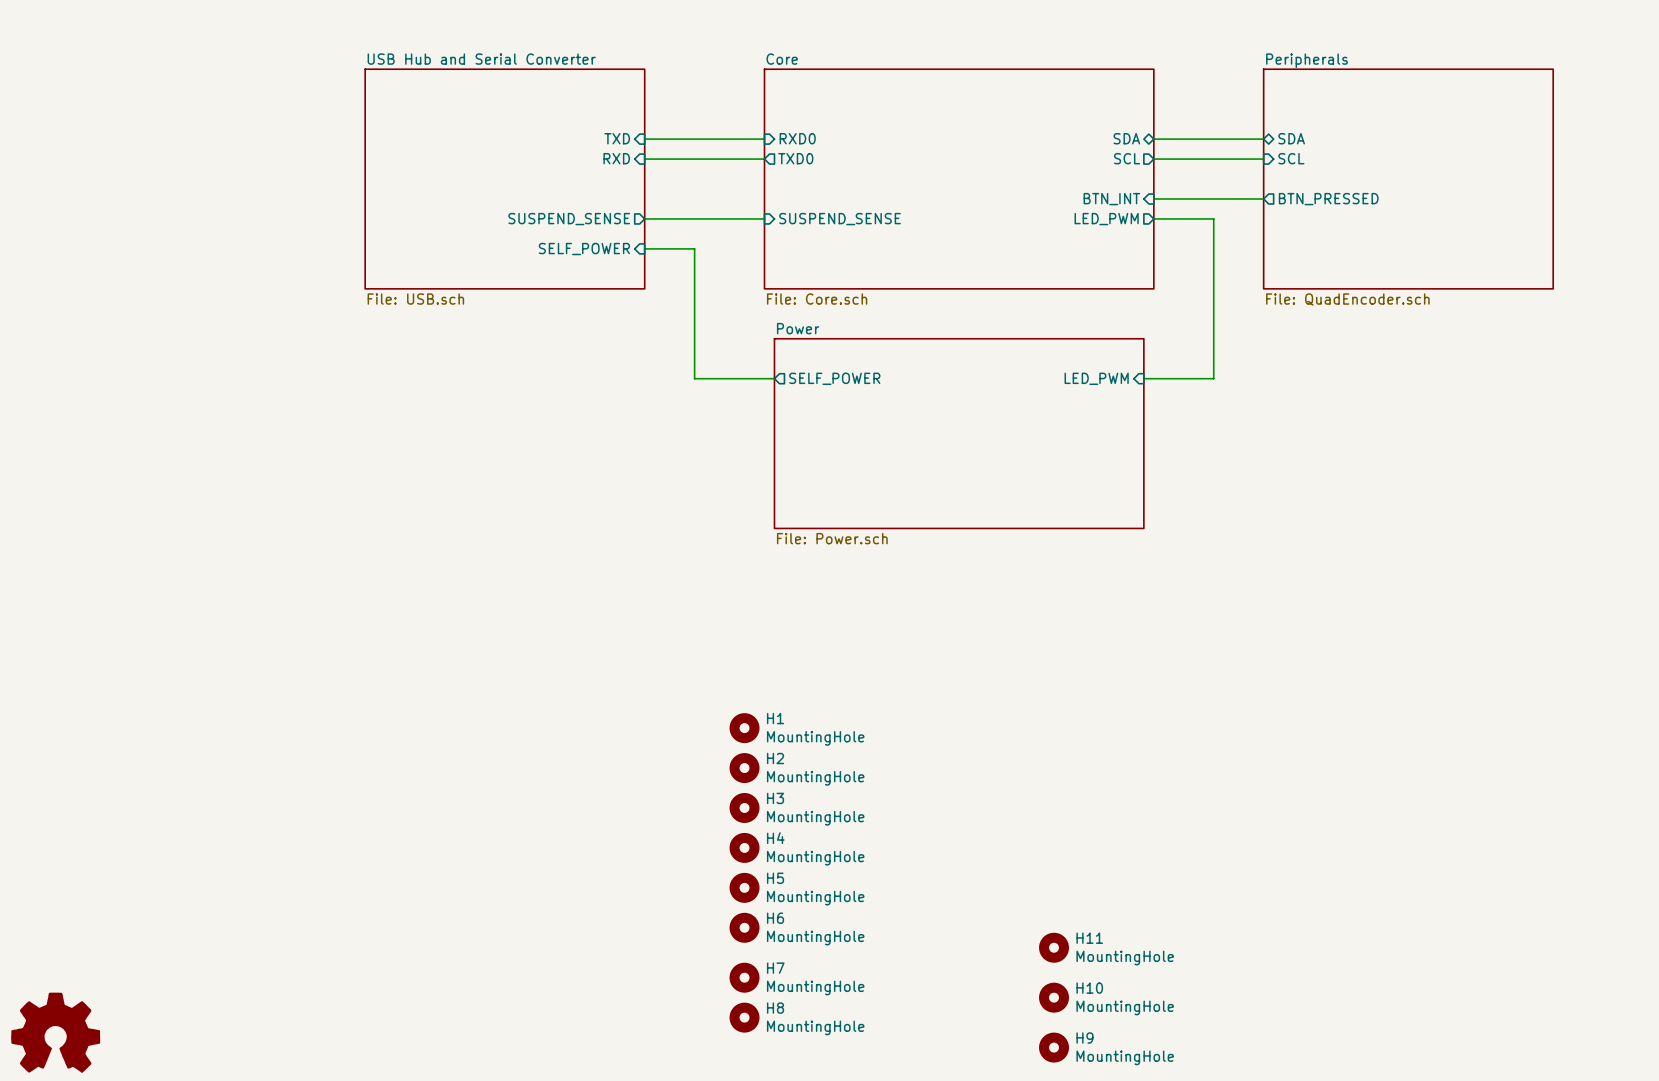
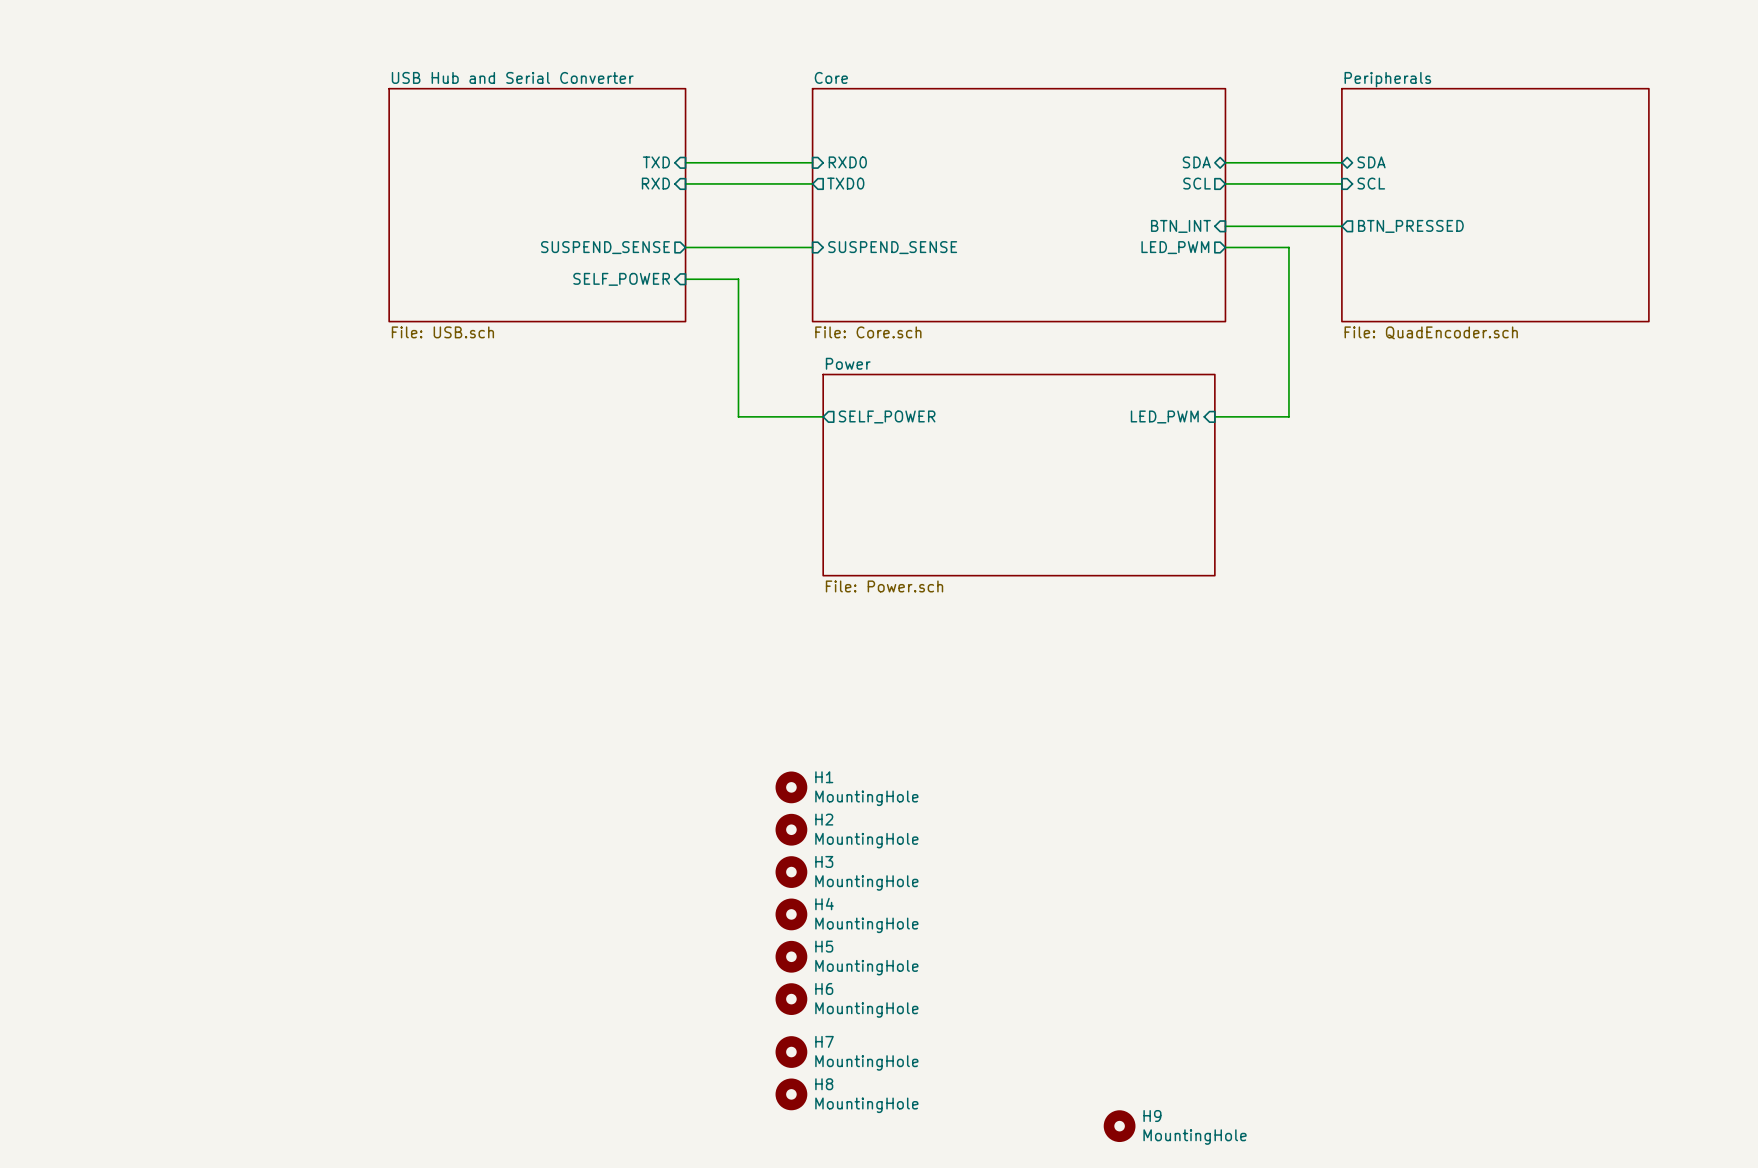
H11: MountingHole (1054, 947) -> none
H10: MountingHole (1054, 997) -> none
power symbol: (55, 1032) -> none

